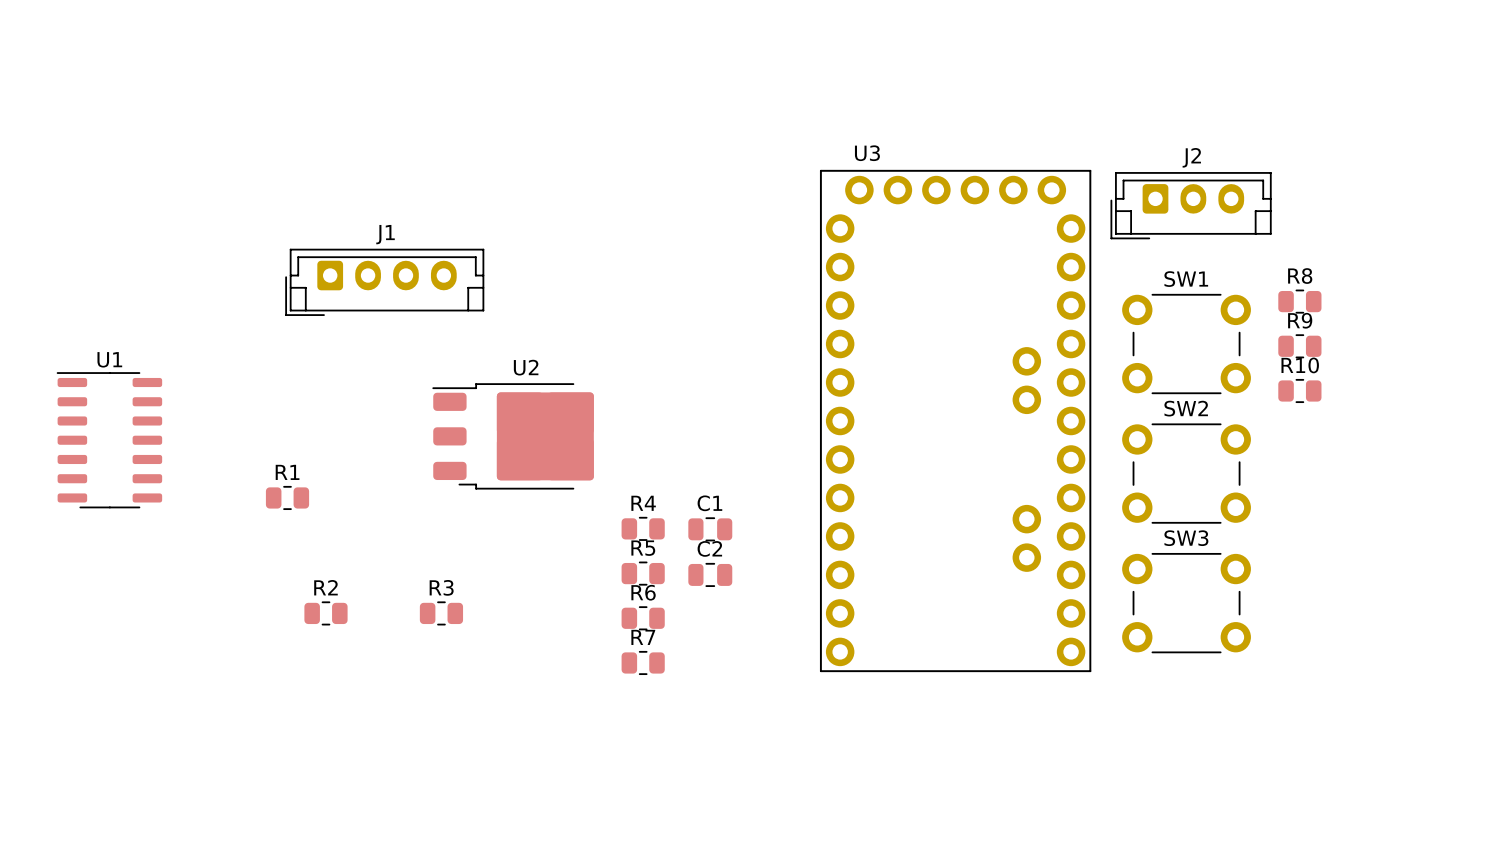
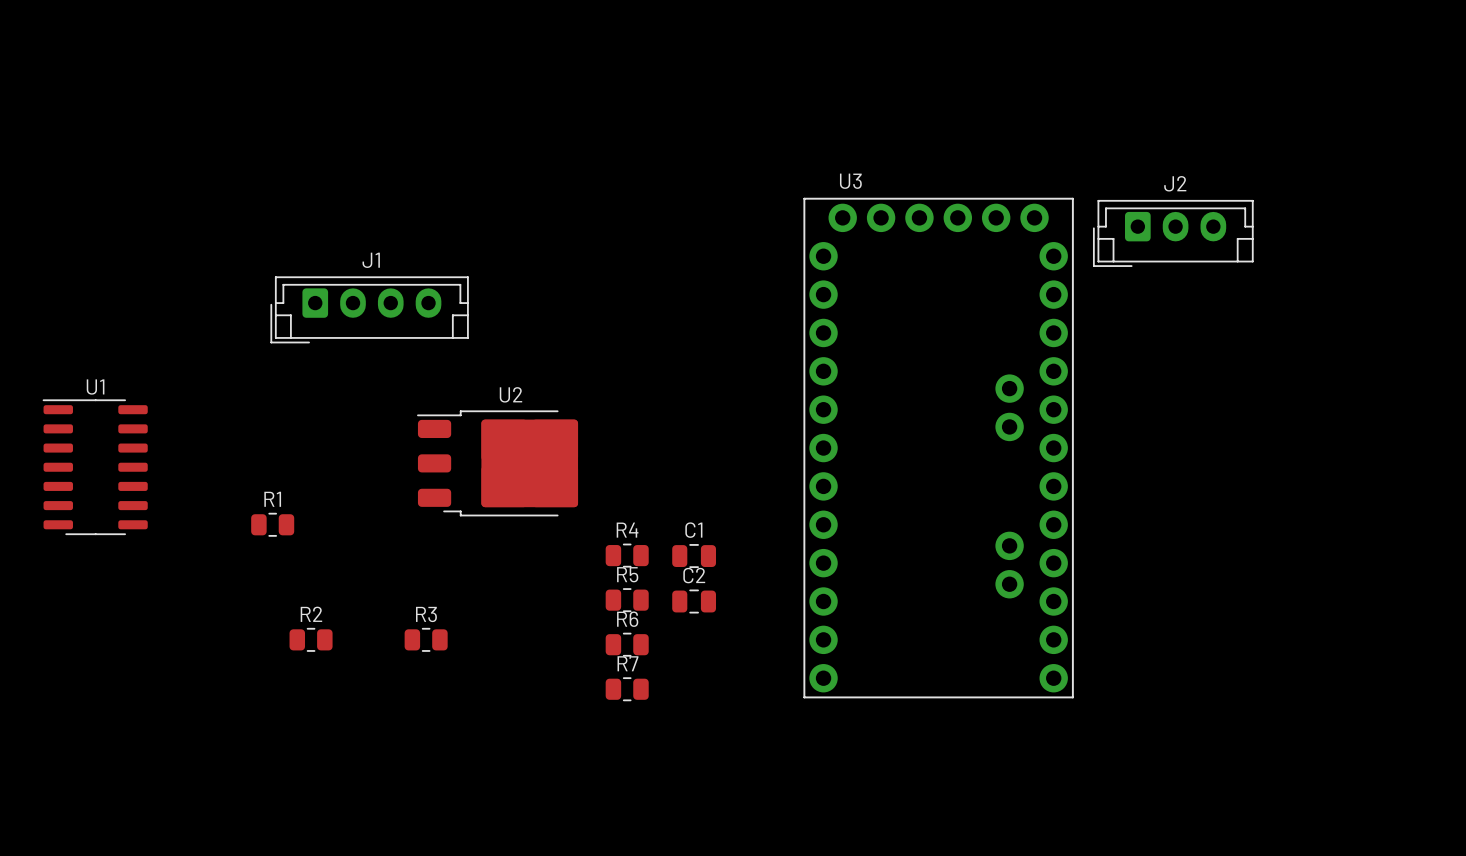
R8: (1299, 301) -> none
SW1: (1186, 344) -> none
R9: (1299, 346) -> none
R10: (1299, 390) -> none
SW2: (1186, 473) -> none
SW3: (1186, 603) -> none

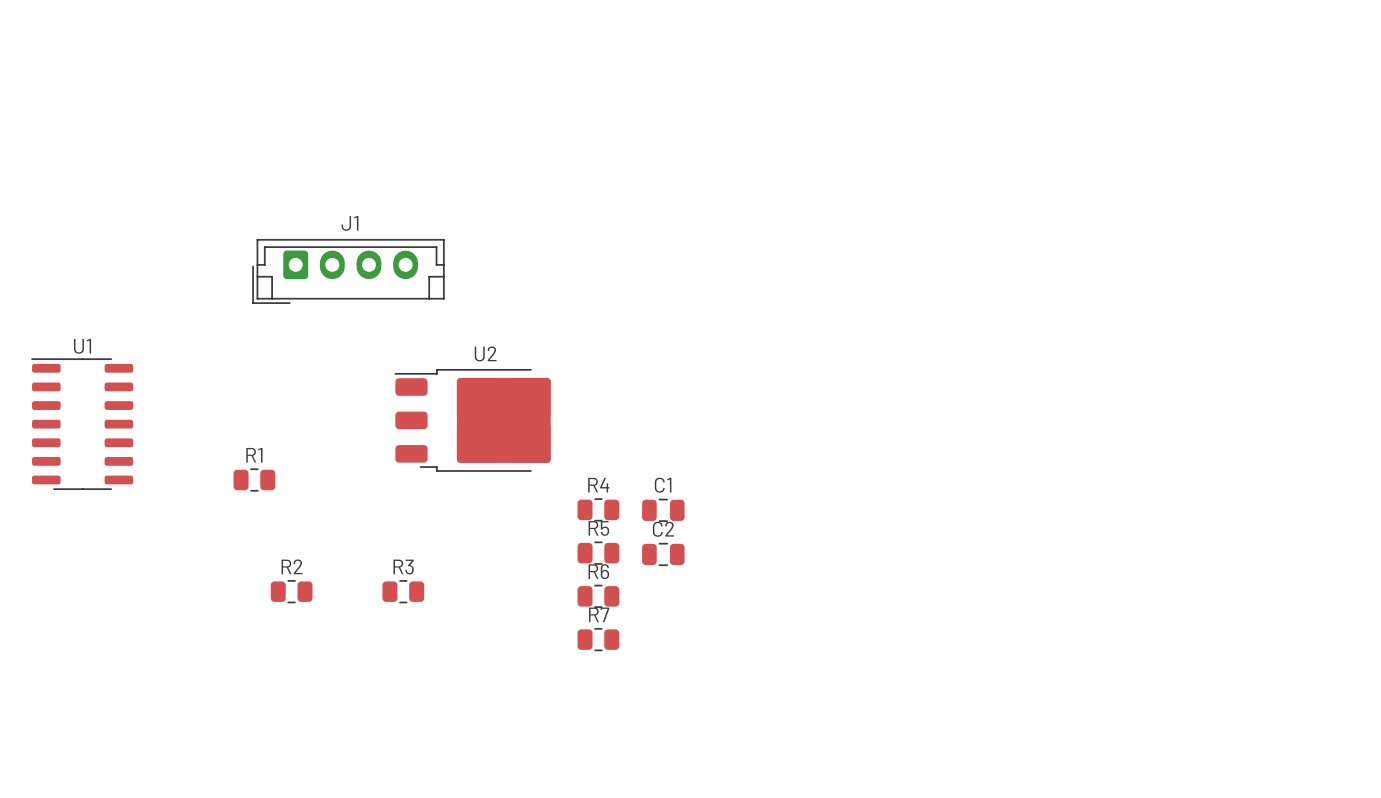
J2: (1173, 233) -> none
U3: (938, 448) -> none

